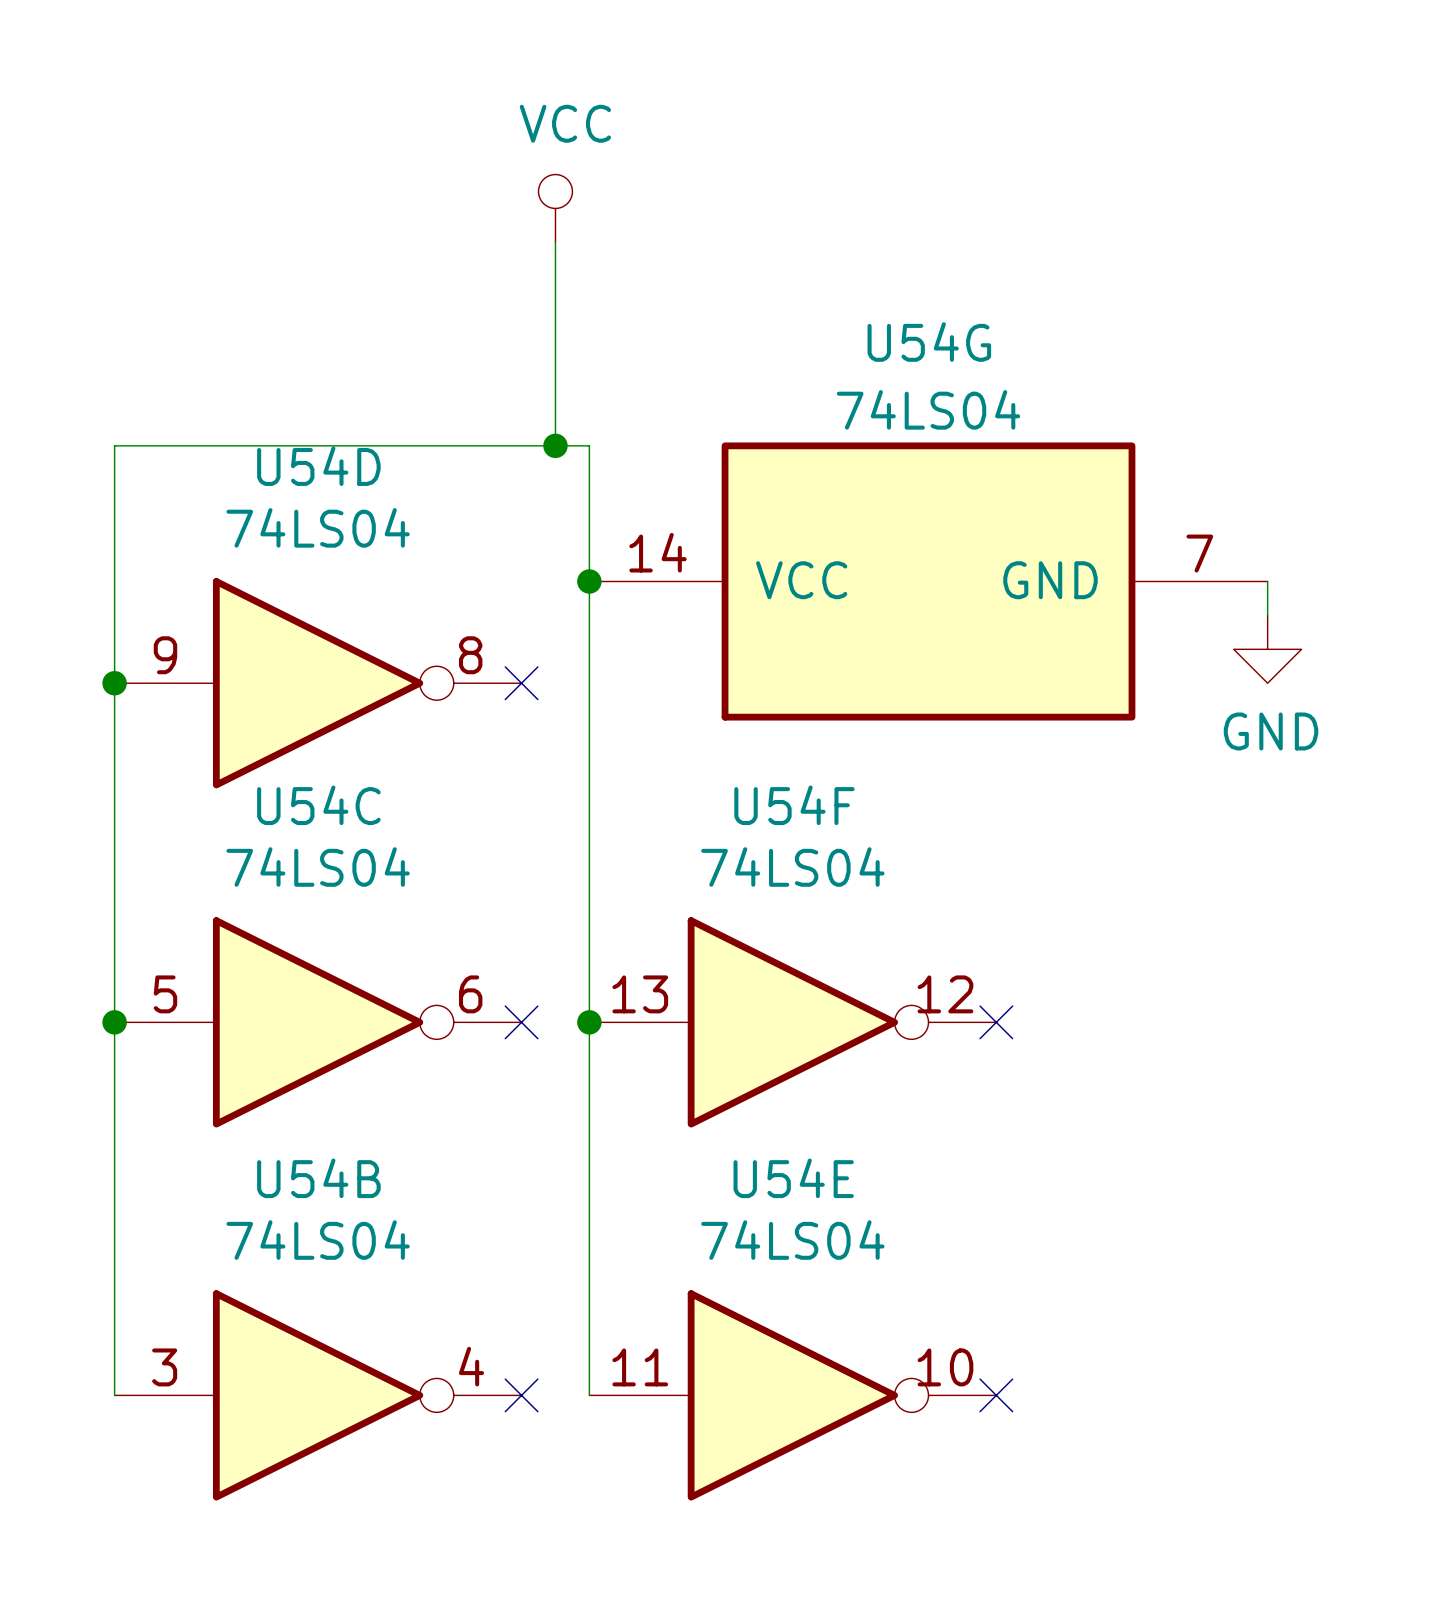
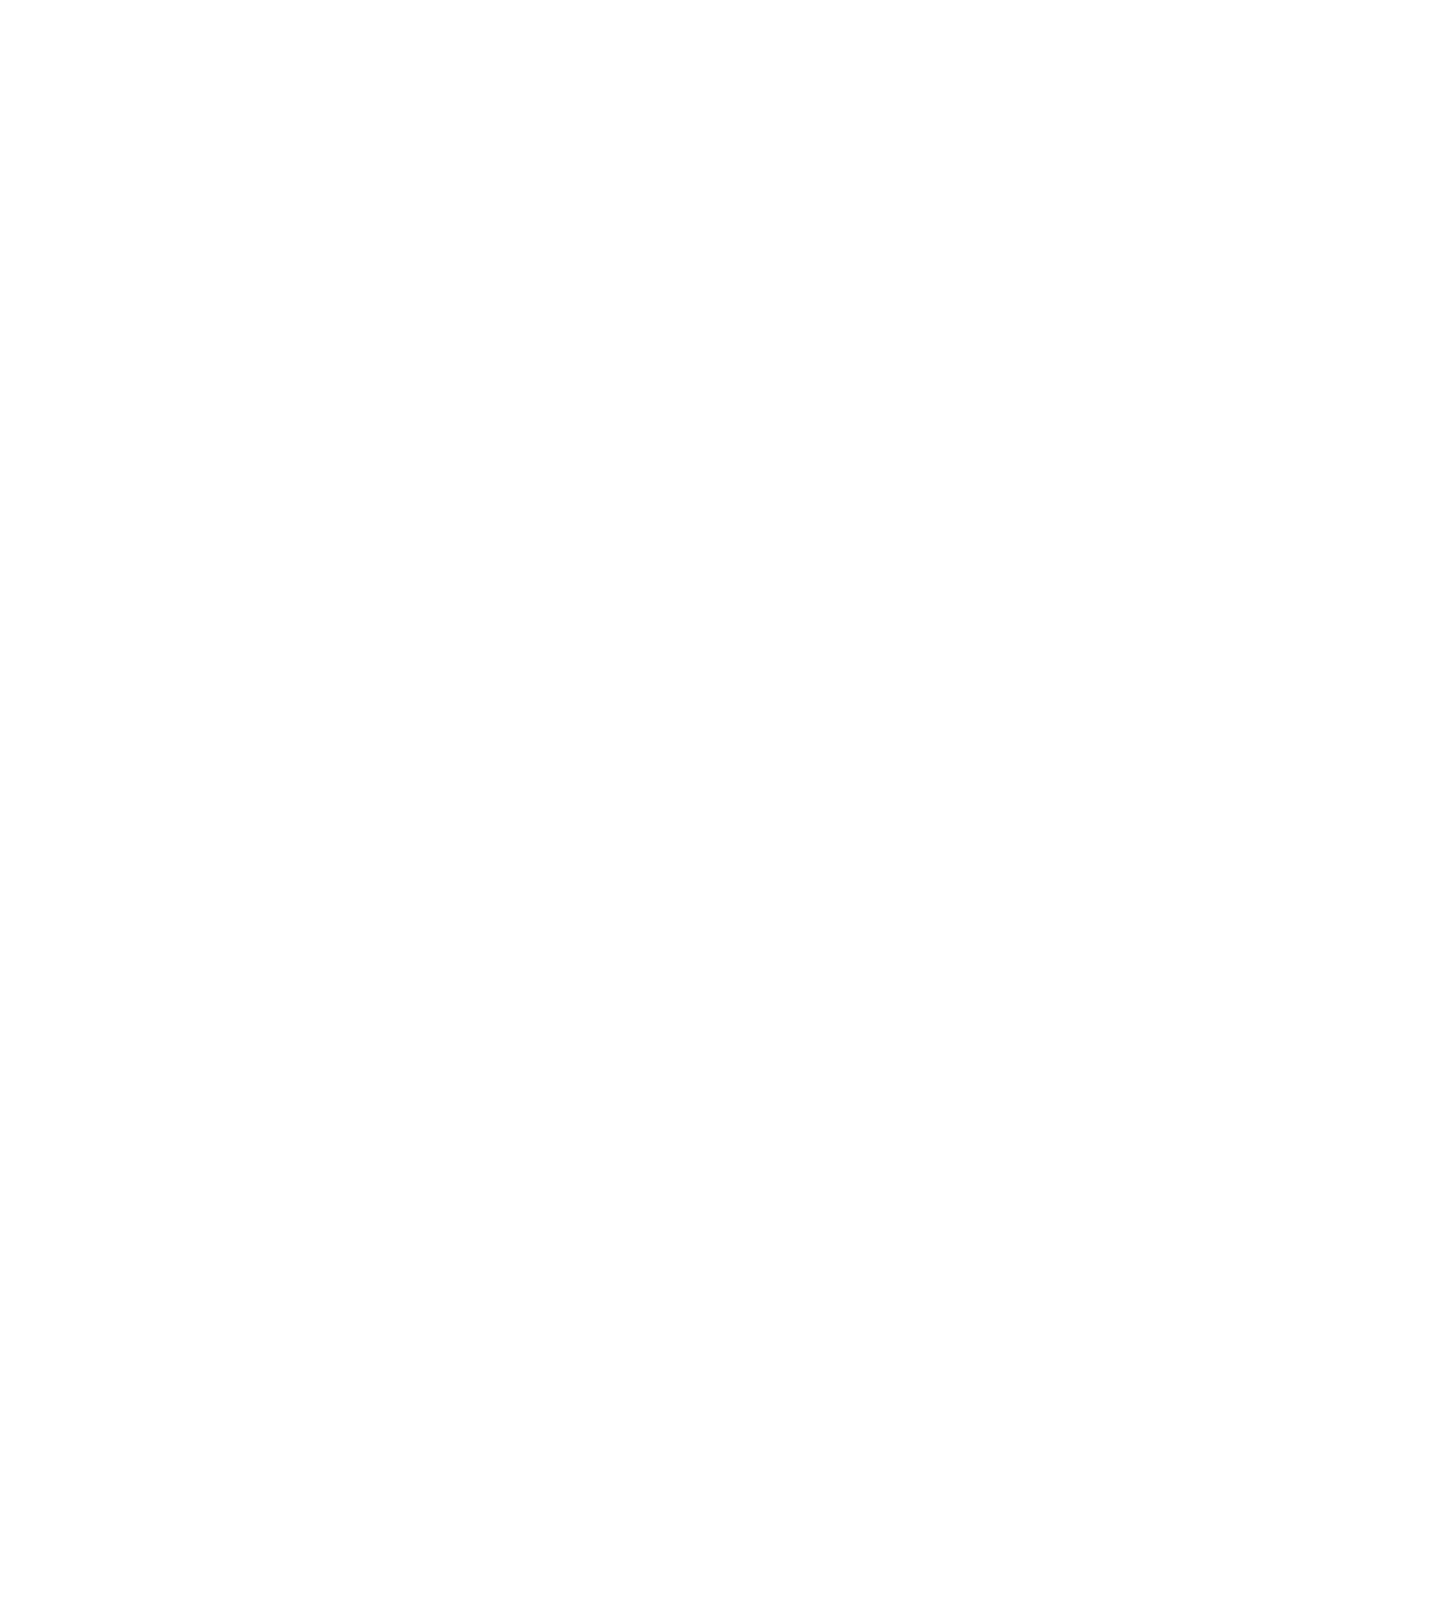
power symbol: VCC (555, 208) -> none
wire: (555, 242) (555, 445) -> none
junction: (555, 445) -> none
junction: (589, 581) -> none
U54G: 74LS04 (928, 581) -> none
wire: (1267, 581) (1267, 615) -> none
power symbol: GND (1267, 649) -> none
junction: (114, 683) -> none
U54D: 74LS04 (318, 683) -> none
no-connect mark: (521, 683) -> none
junction: (114, 1022) -> none
U54C: 74LS04 (318, 1022) -> none
no-connect mark: (521, 1022) -> none
junction: (589, 1022) -> none
U54F: 74LS04 (792, 1022) -> none
no-connect mark: (996, 1022) -> none
wire: (114, 1395) (114, 445) (589, 445) (589, 1395) -> none
U54B: 74LS04 (318, 1395) -> none
no-connect mark: (521, 1395) -> none
U54E: 74LS04 (792, 1395) -> none
no-connect mark: (996, 1395) -> none

